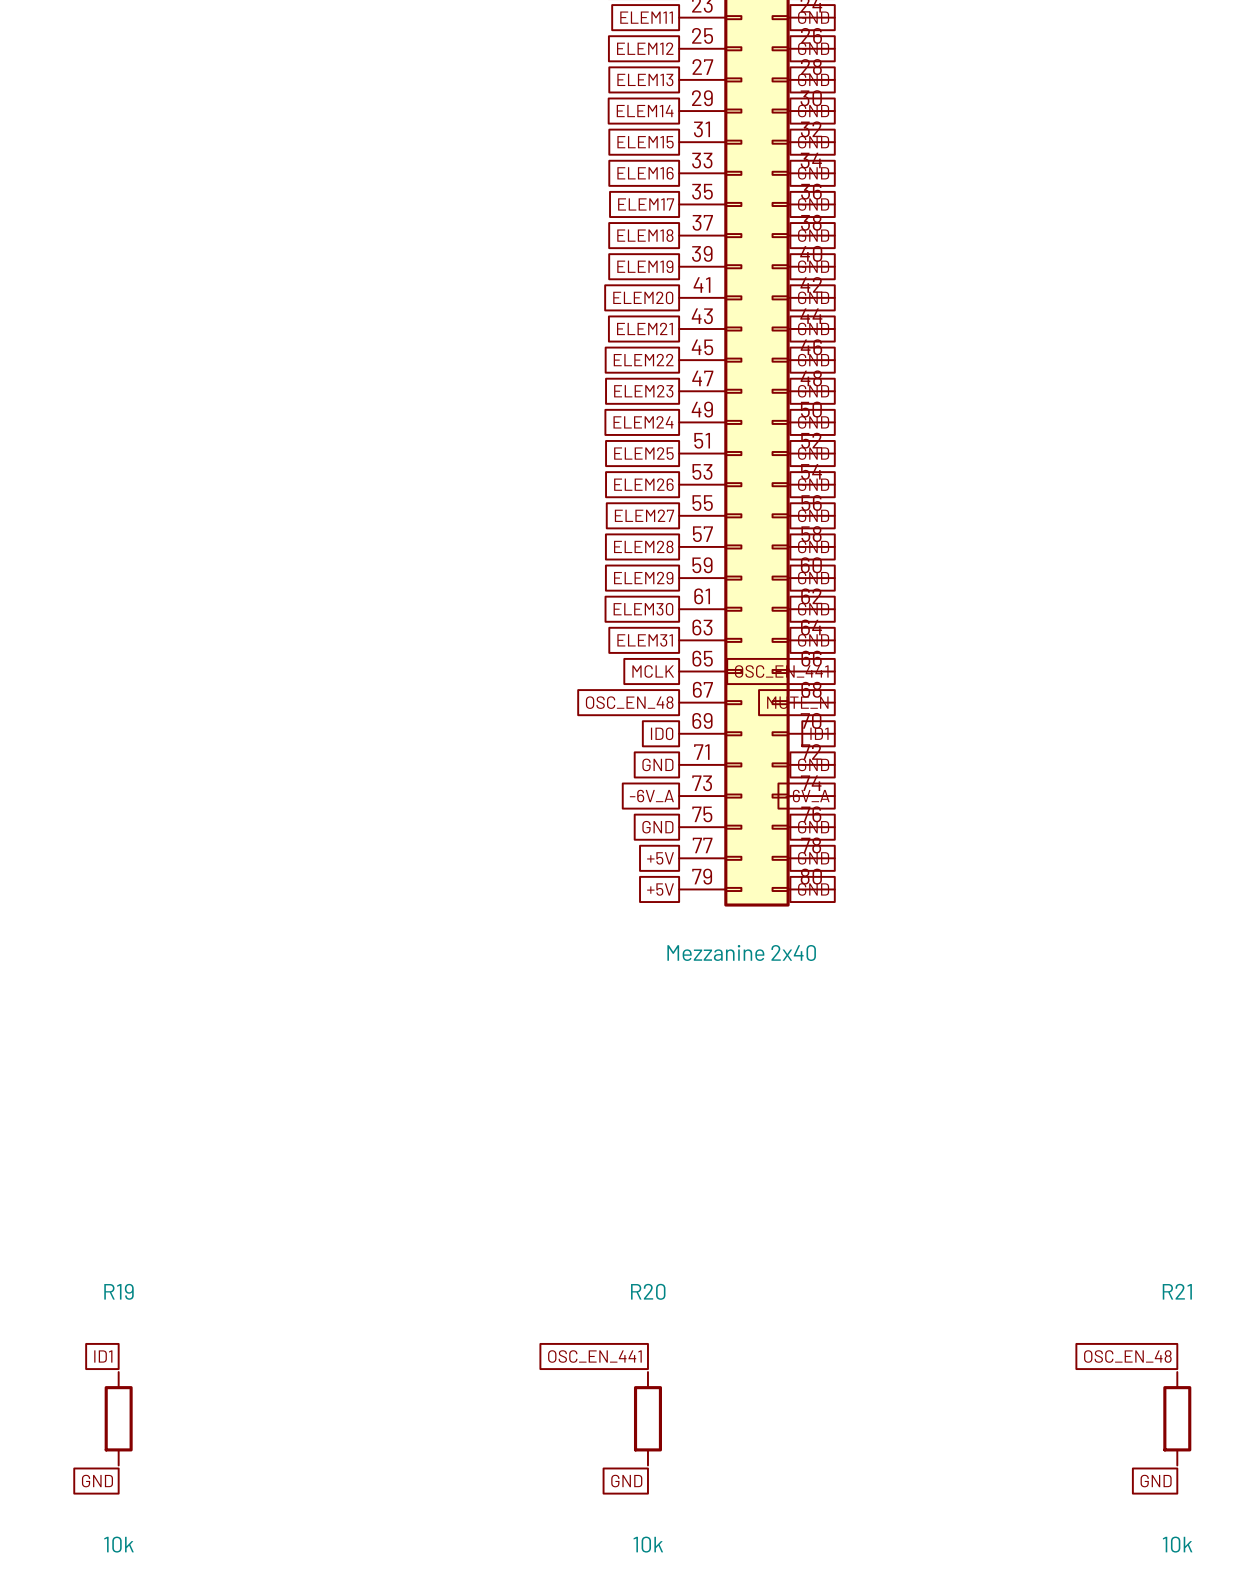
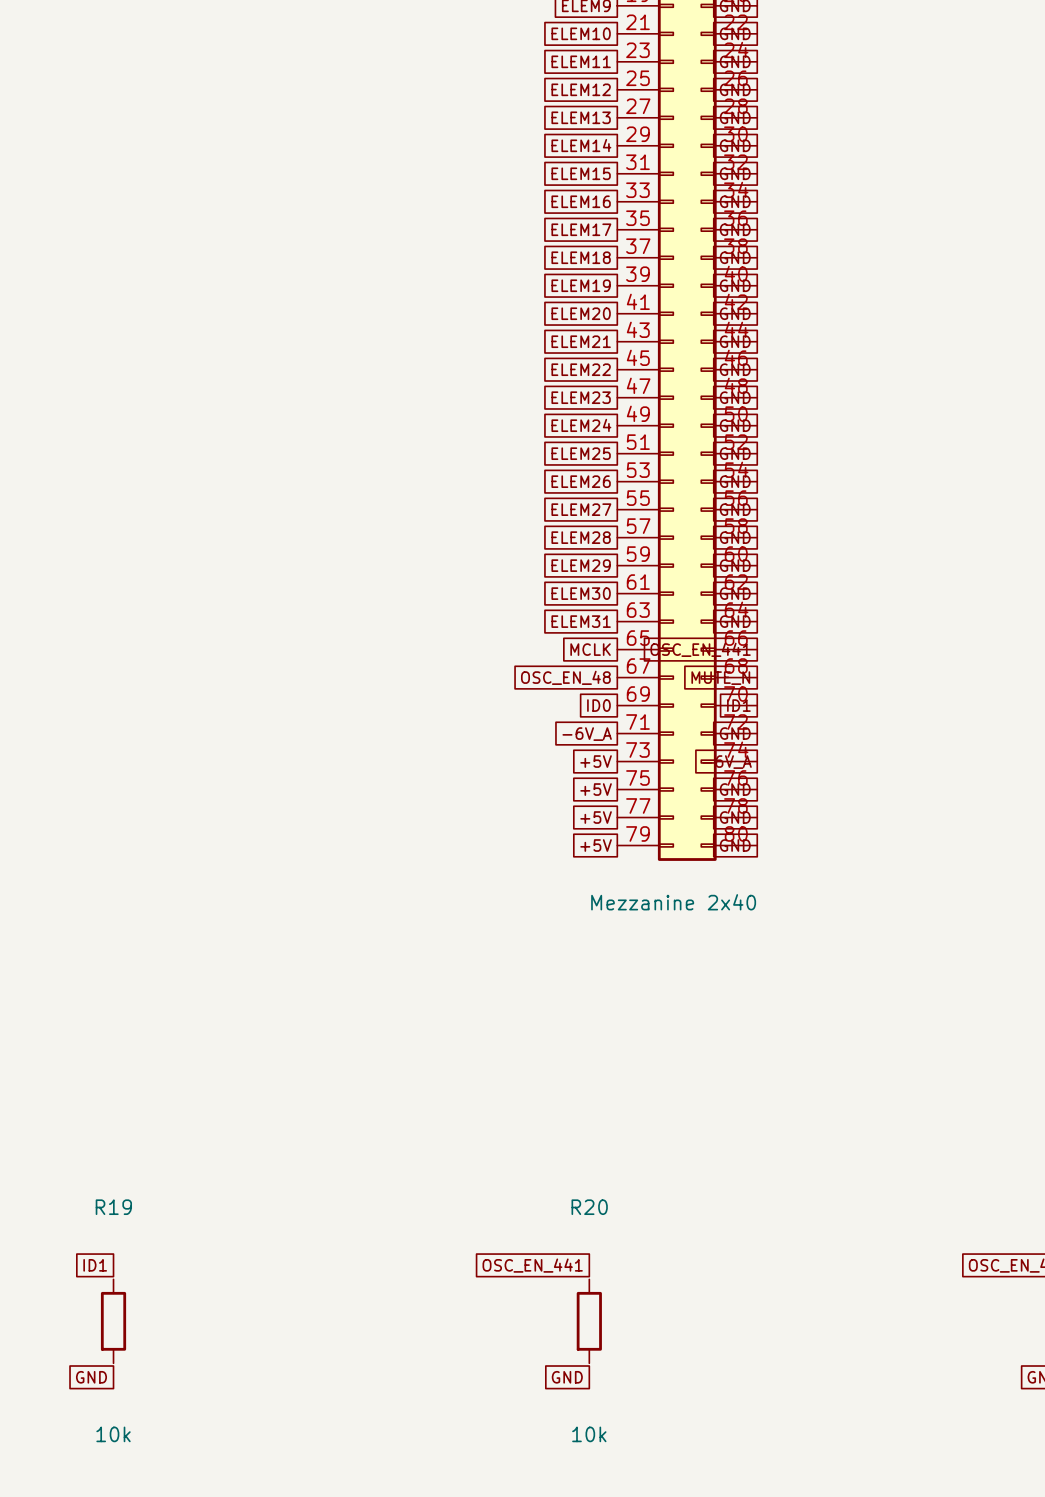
global label: GND (657, 764) -> -6V_A (587, 734)
global label: -6V_A (651, 796) -> +5V (596, 761)
global label: GND (657, 827) -> +5V (596, 789)

